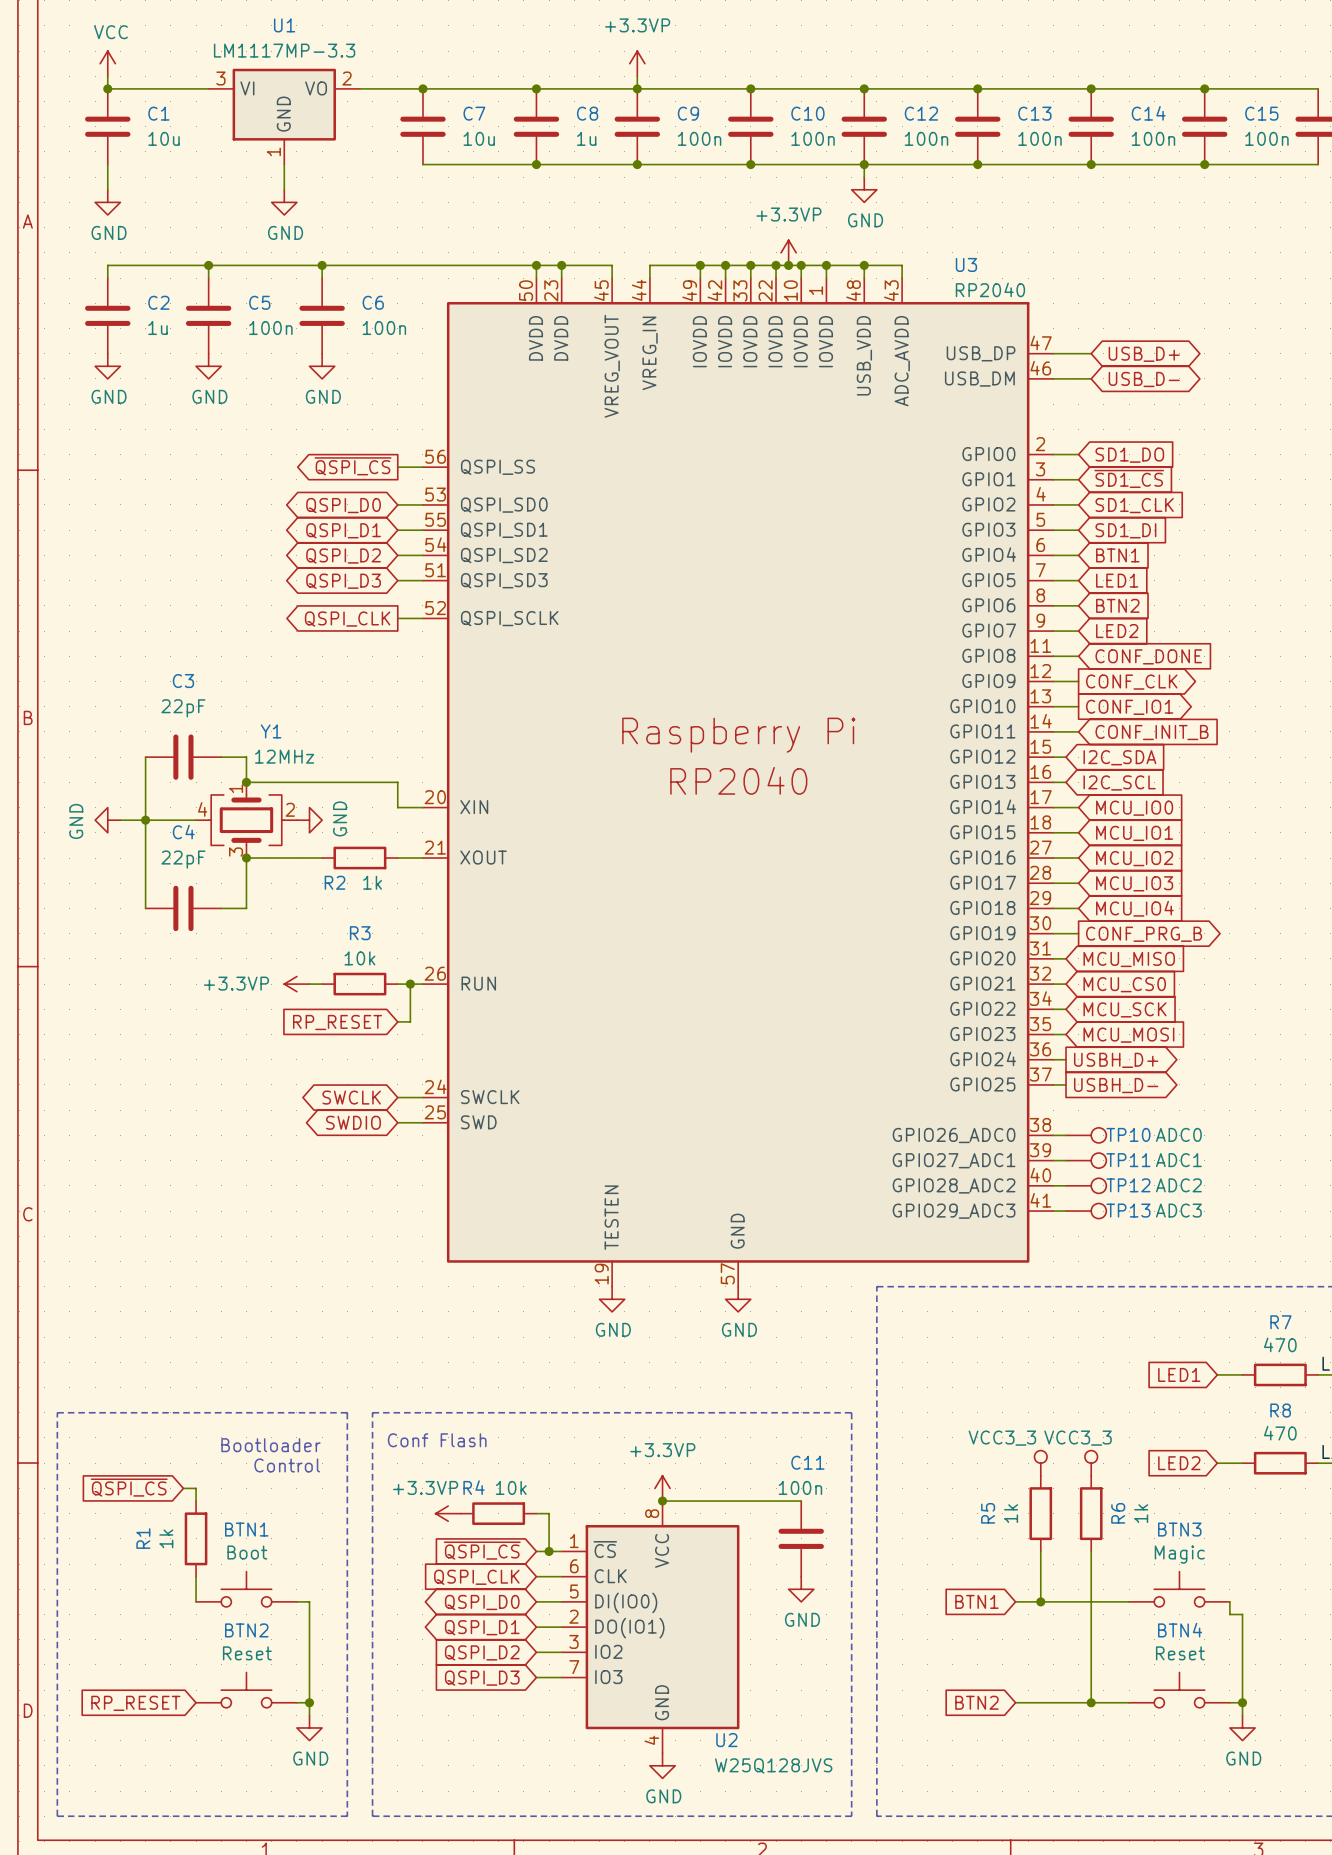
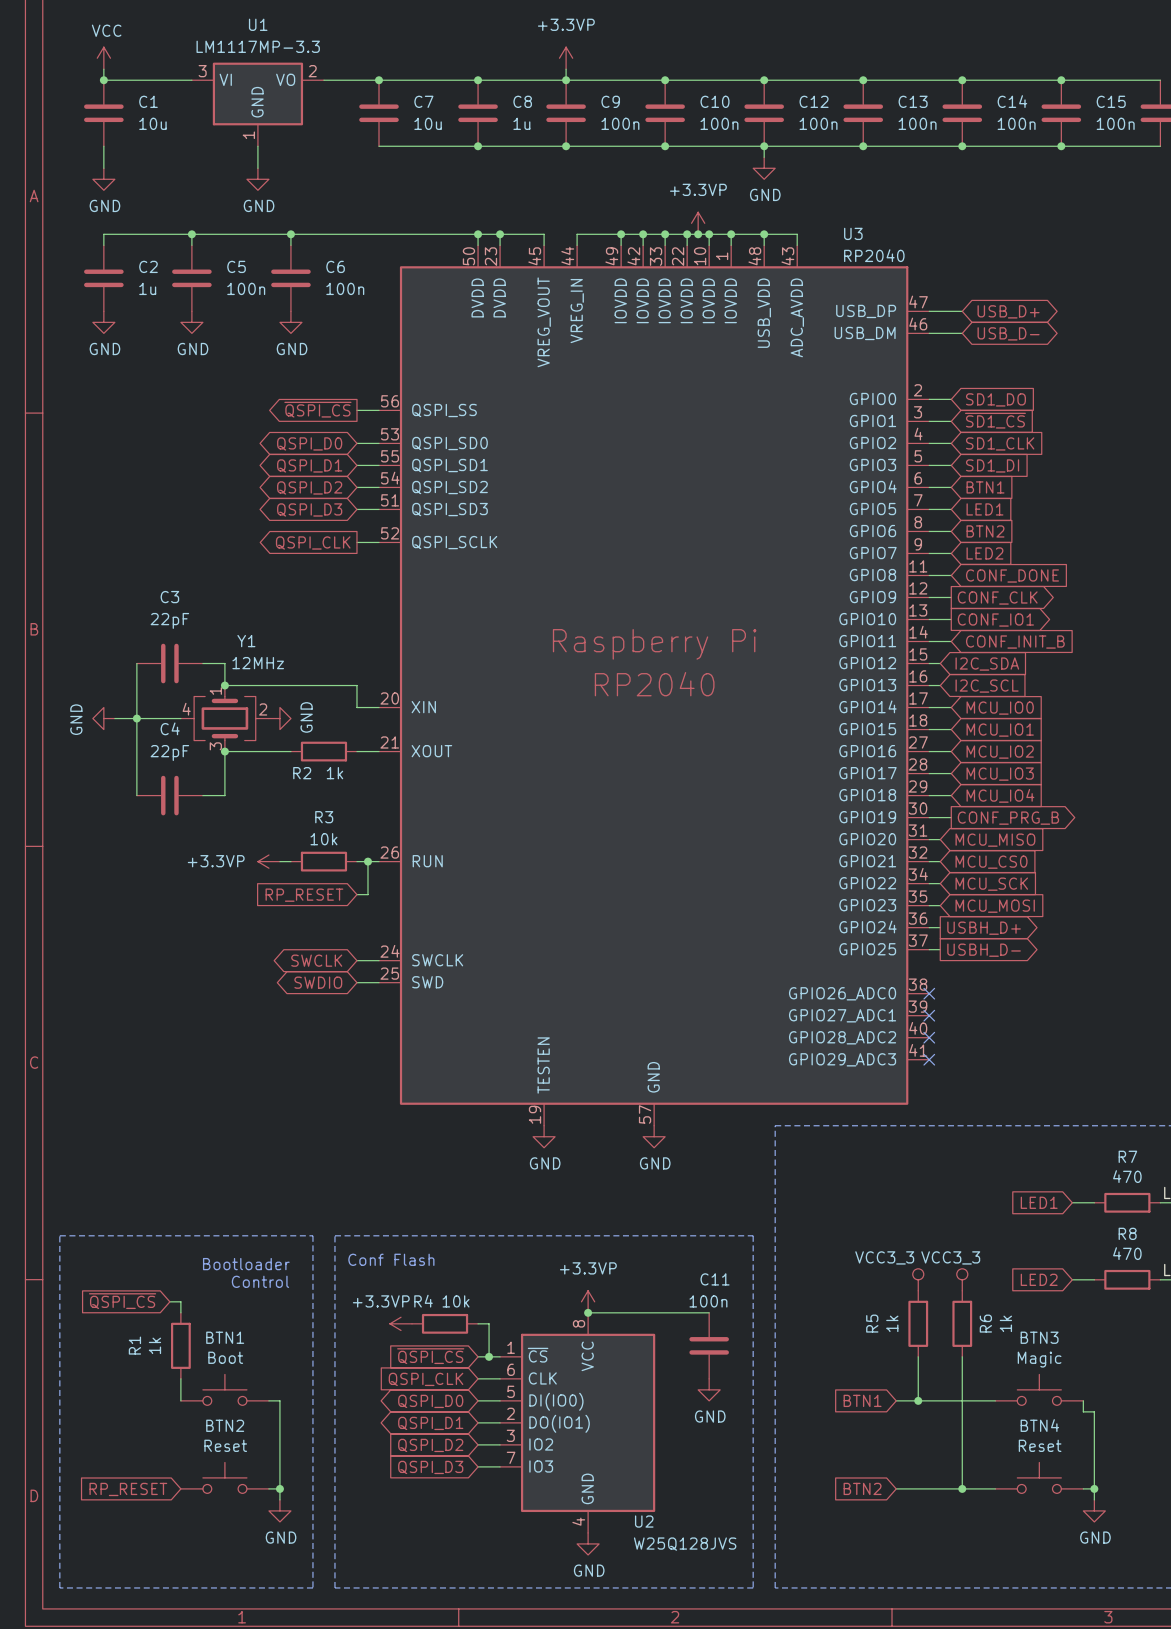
wire: (1053, 1135) (1066, 1135) -> none
no-connect mark: none -> (929, 993)
TP10: ADC0 (1086, 1135) -> none
wire: (1053, 1160) (1066, 1160) -> none
no-connect mark: none -> (929, 1015)
TP11: ADC1 (1086, 1160) -> none
wire: (1053, 1185) (1066, 1185) -> none
no-connect mark: none -> (929, 1037)
TP12: ADC2 (1086, 1185) -> none
wire: (1053, 1211) (1066, 1211) -> none
no-connect mark: none -> (929, 1059)
TP13: ADC3 (1086, 1211) -> none

